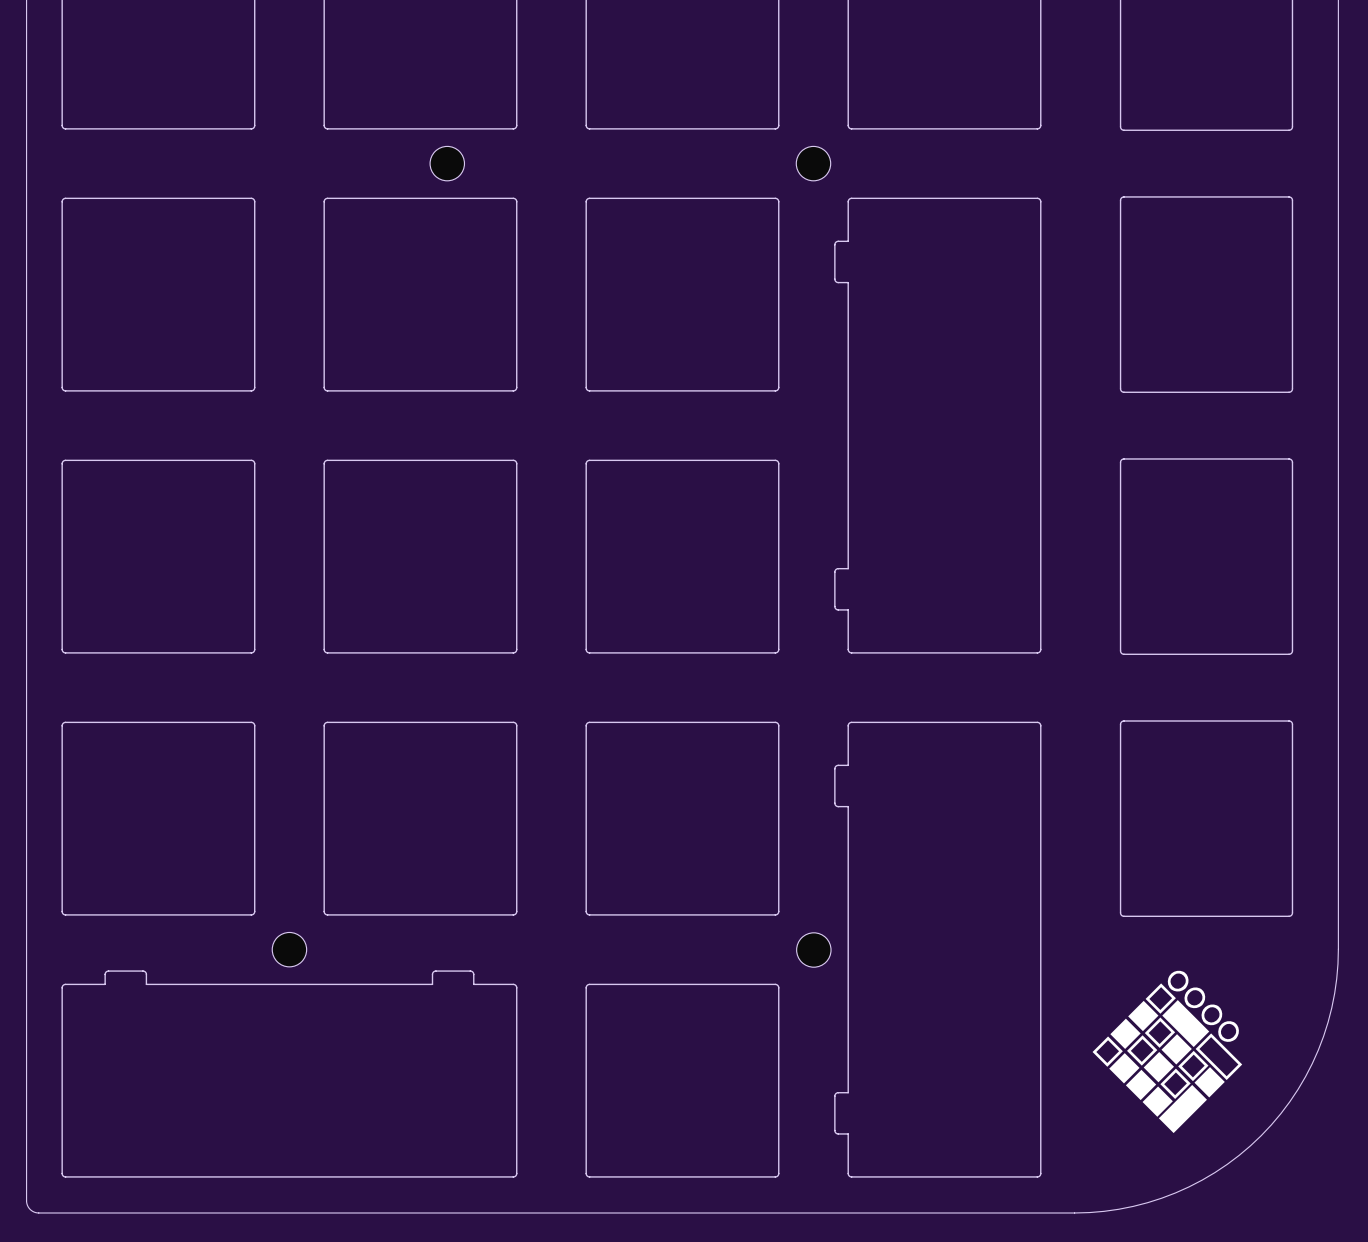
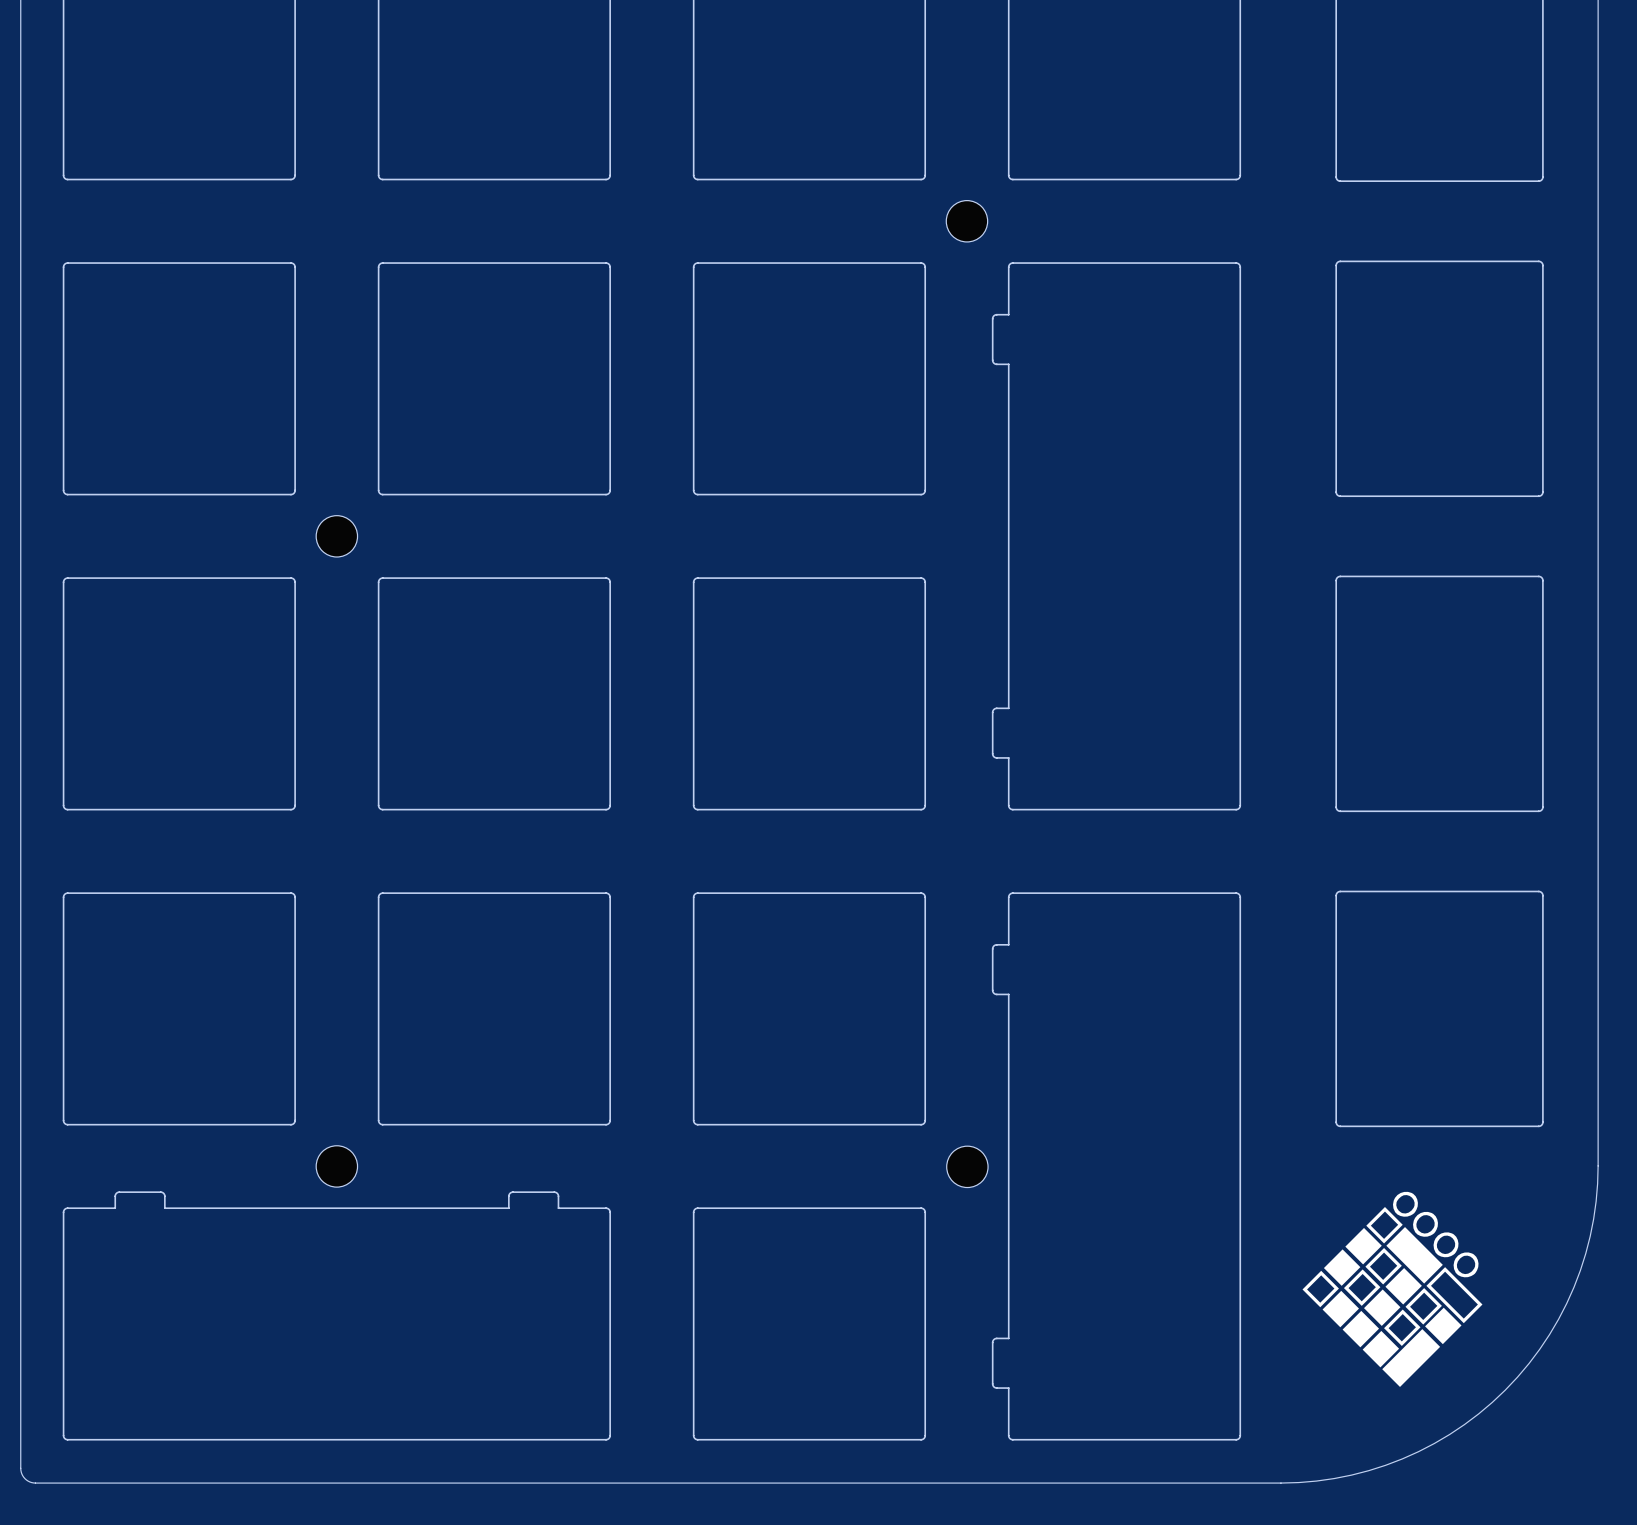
part position: (447, 163) -> (336, 536)

